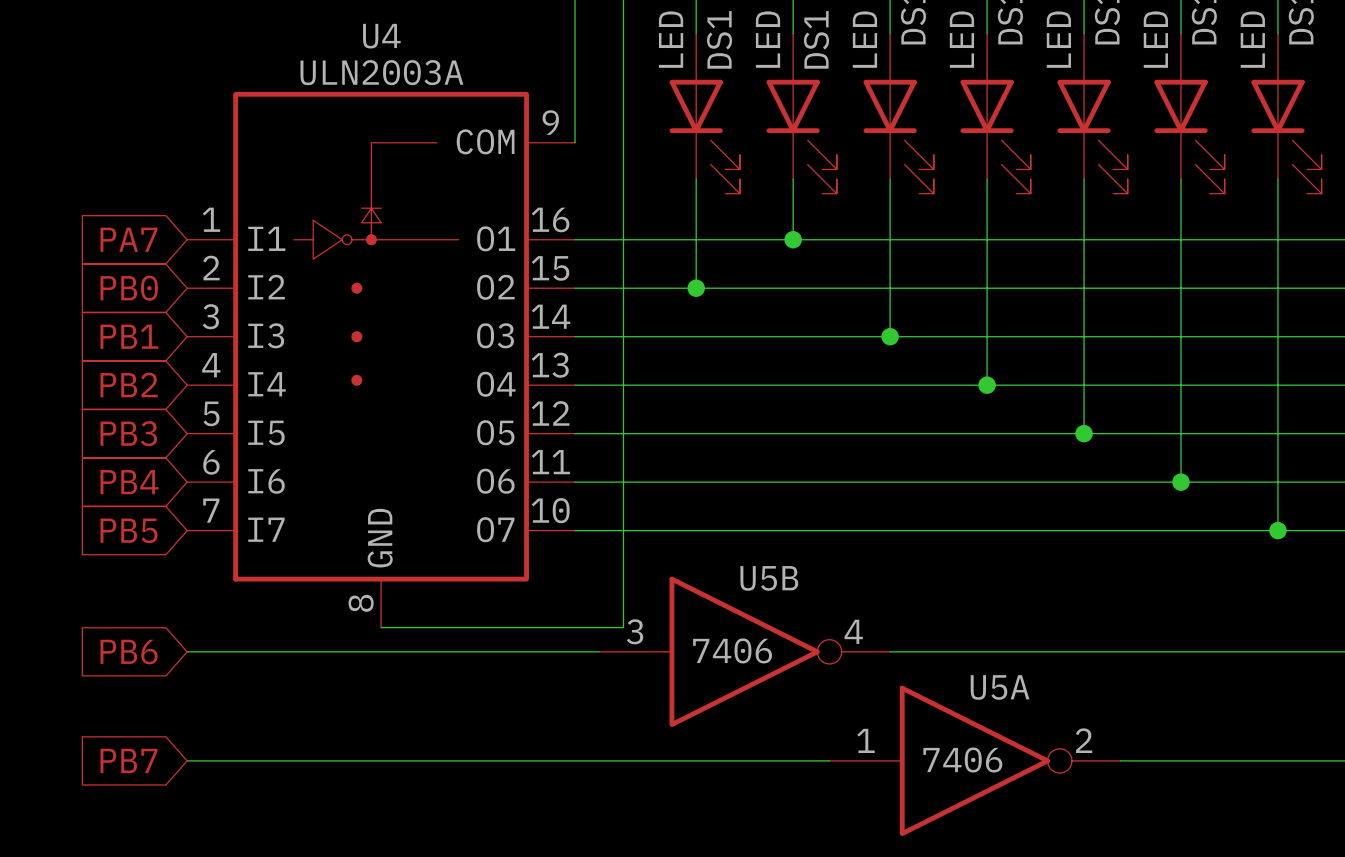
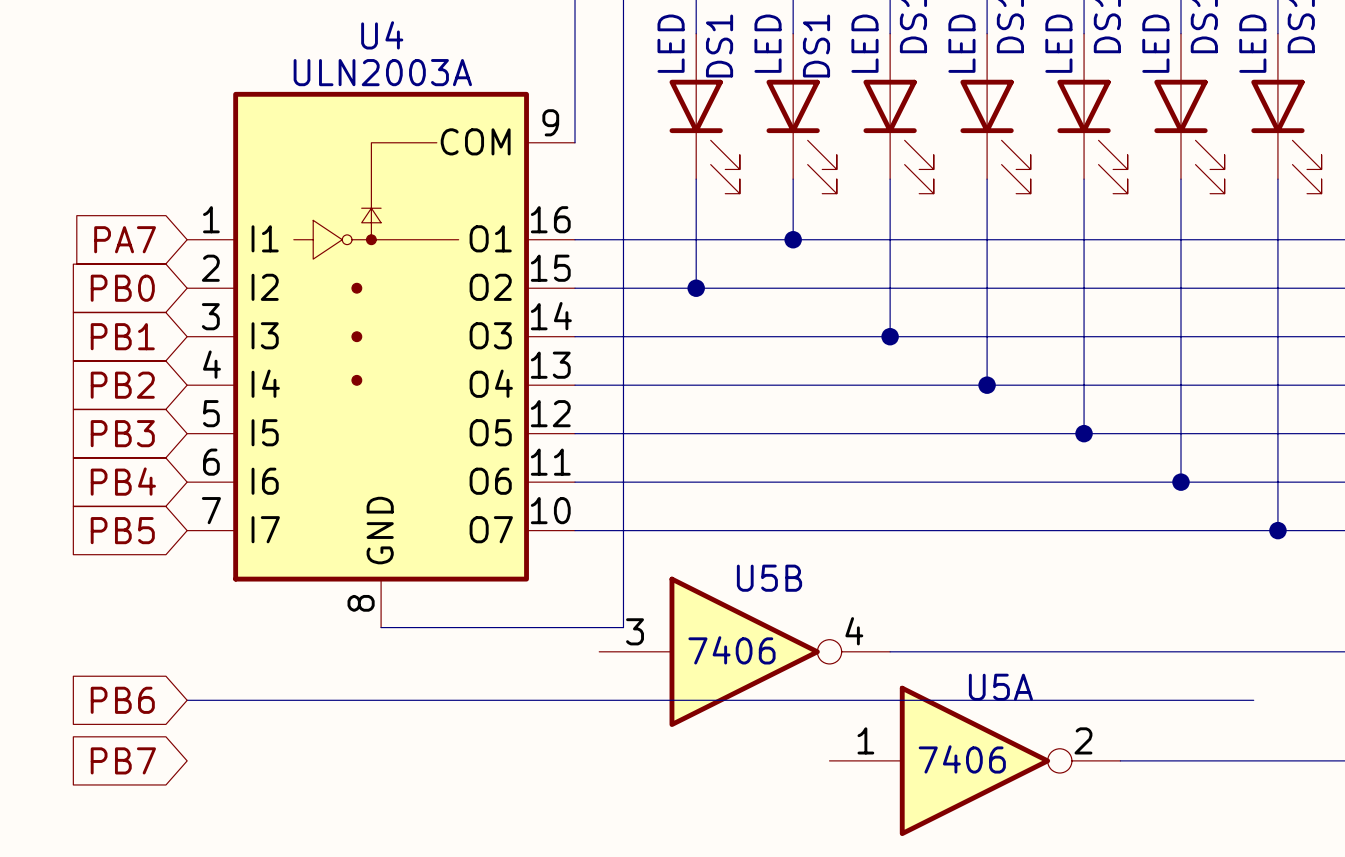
wire: (187, 651) (599, 651) -> none
global label position: PB6 (129, 652) -> PB6 (122, 700)
wire: none -> (187, 700) (1253, 700)
wire: (187, 760) (829, 760) -> none

